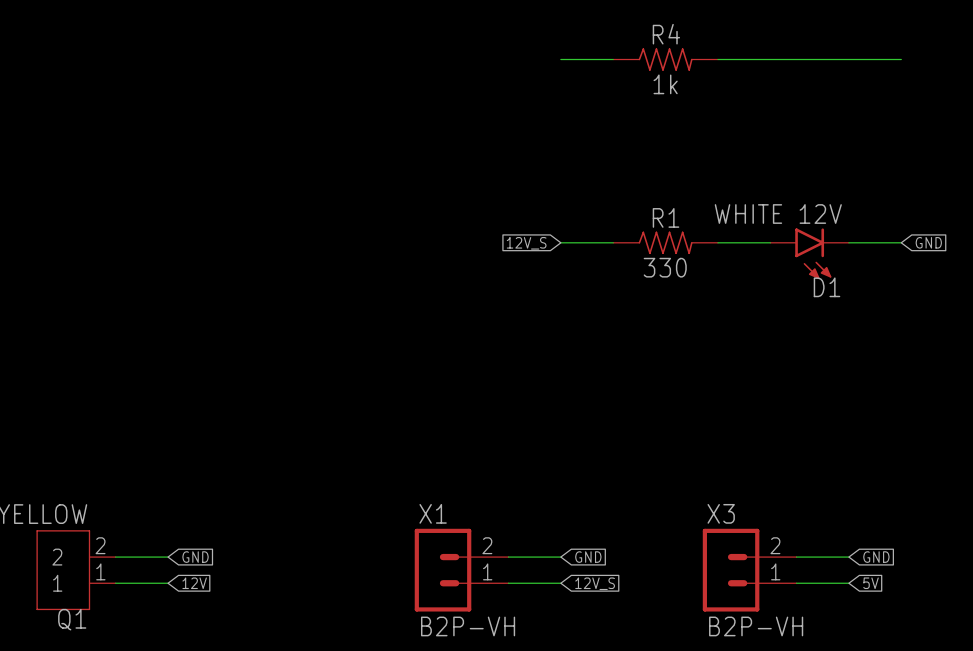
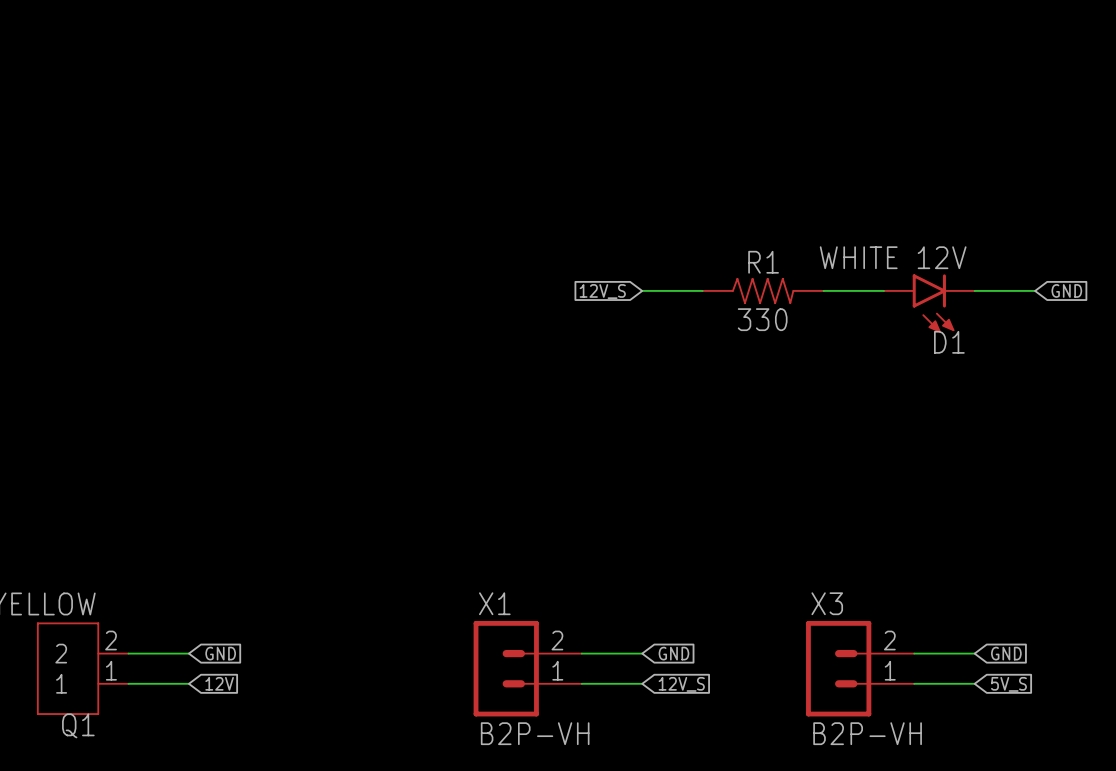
wire: (560, 59) (613, 59) -> none
R4: 1k (665, 59) -> none
wire: (717, 59) (901, 59) -> none
global label: 5V (871, 583) -> 5V_S (1008, 684)

